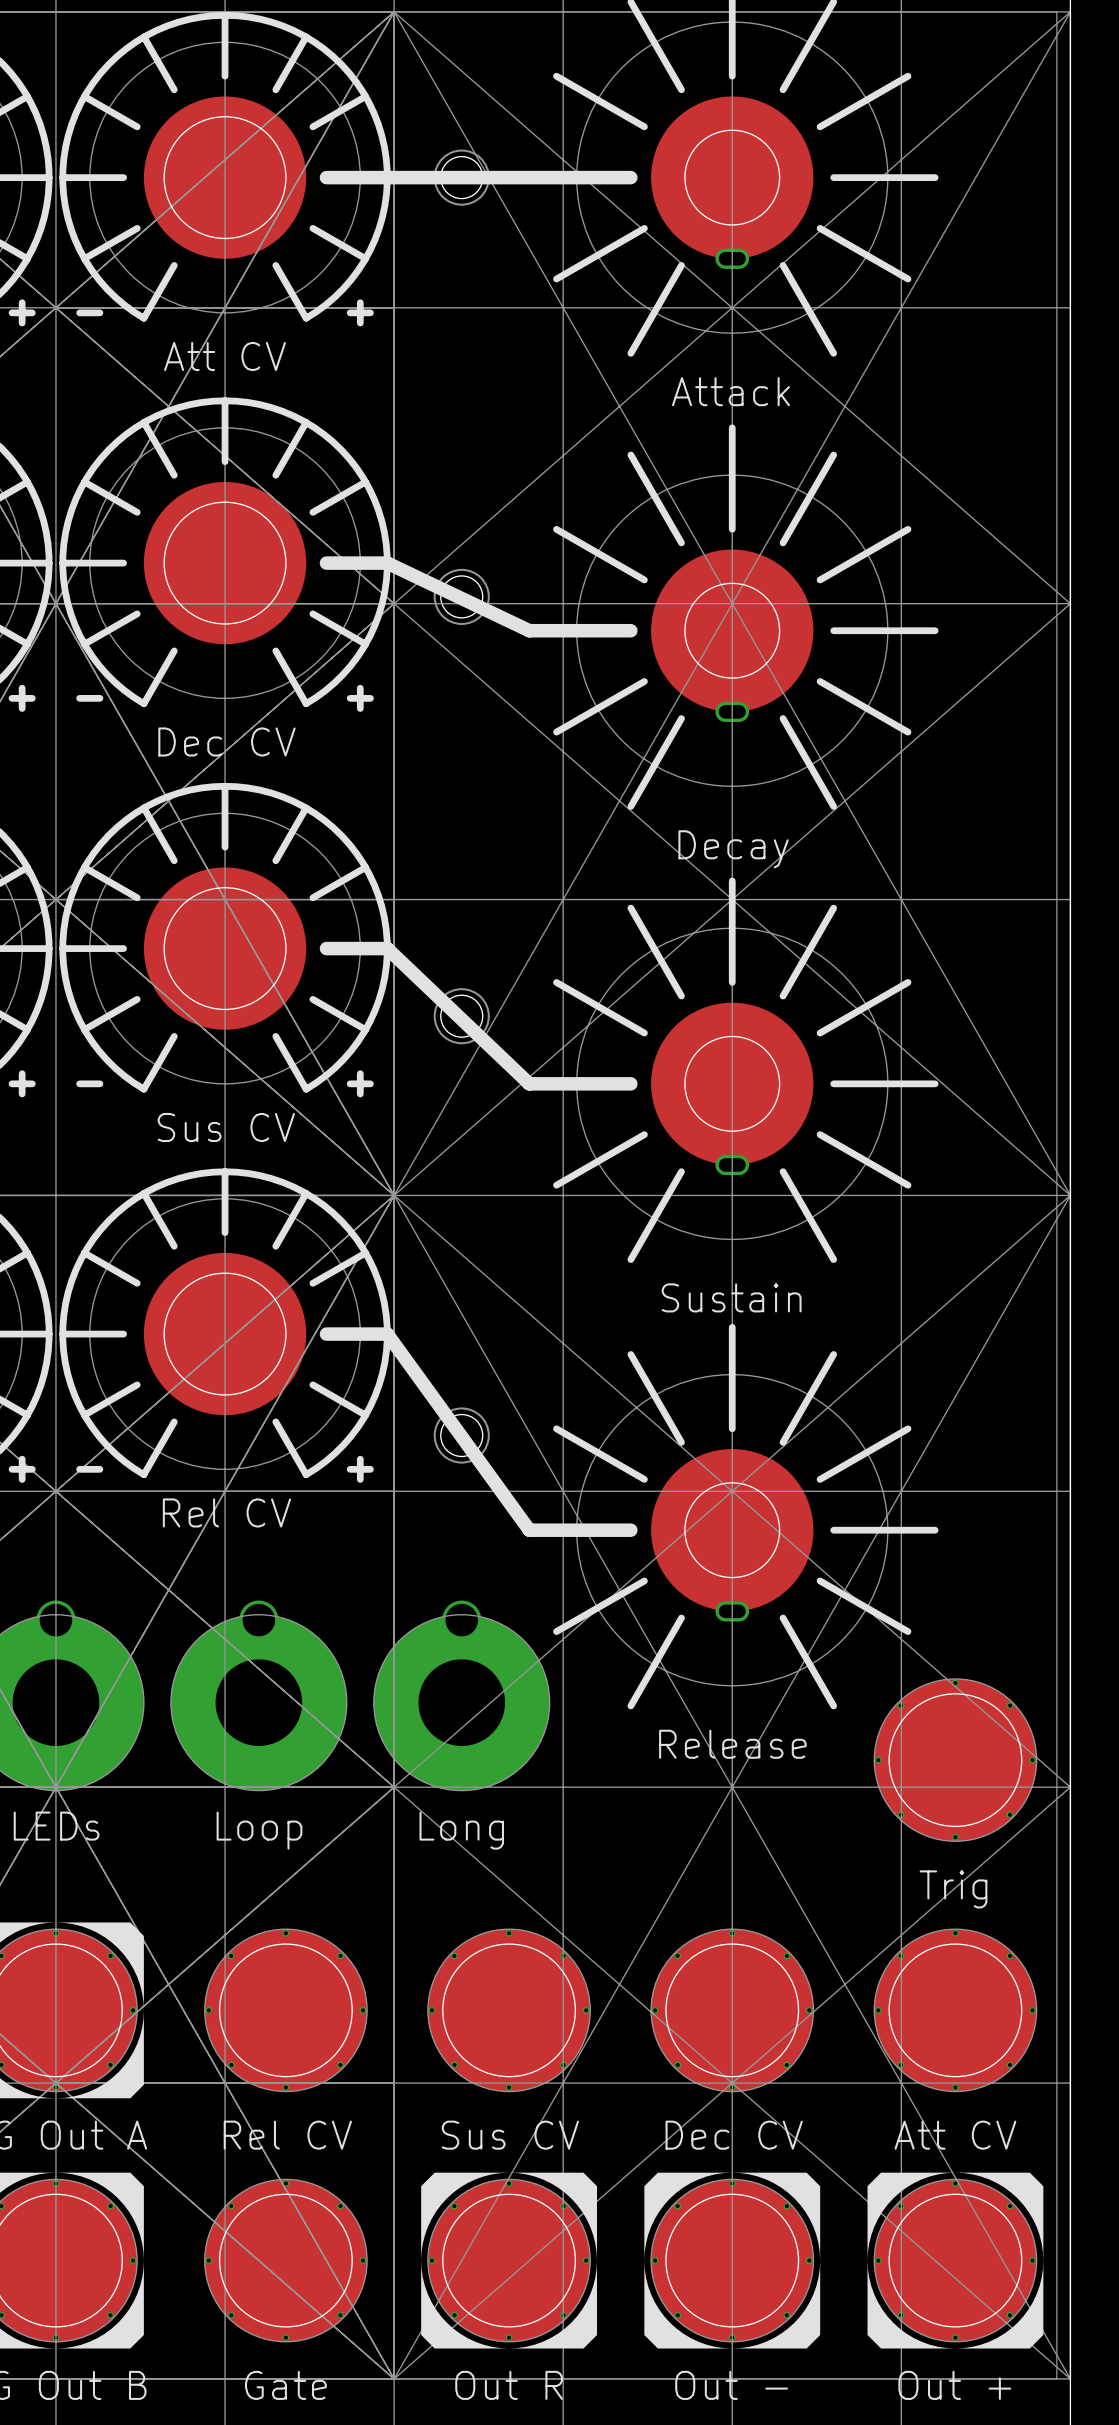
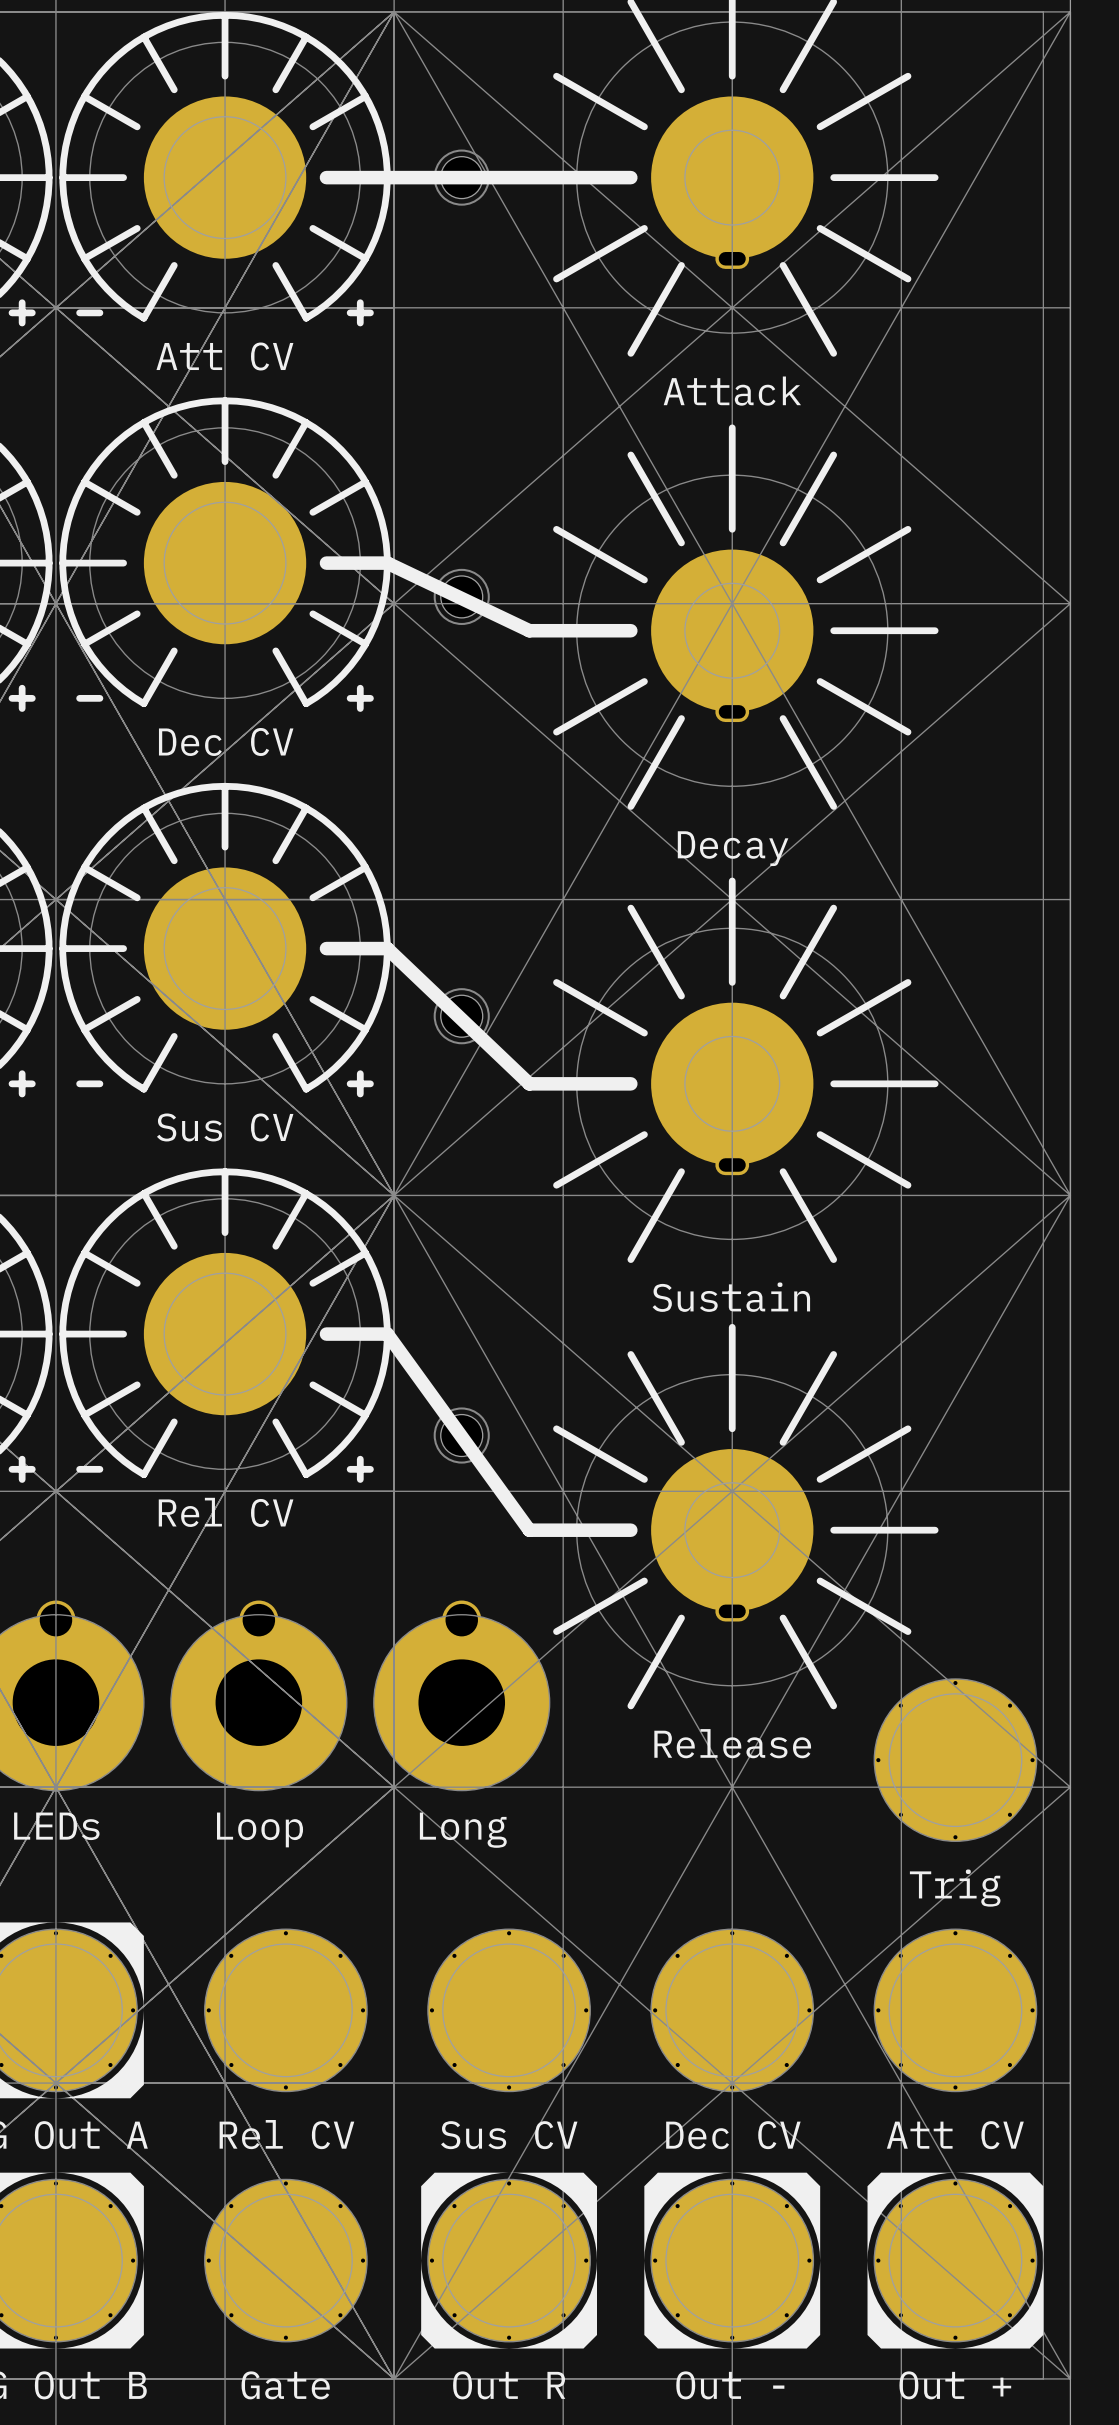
line: (1043, 11) (1056, 11) (1056, 2378) (1043, 2378) -> (1043, 11) (1043, 2378)

